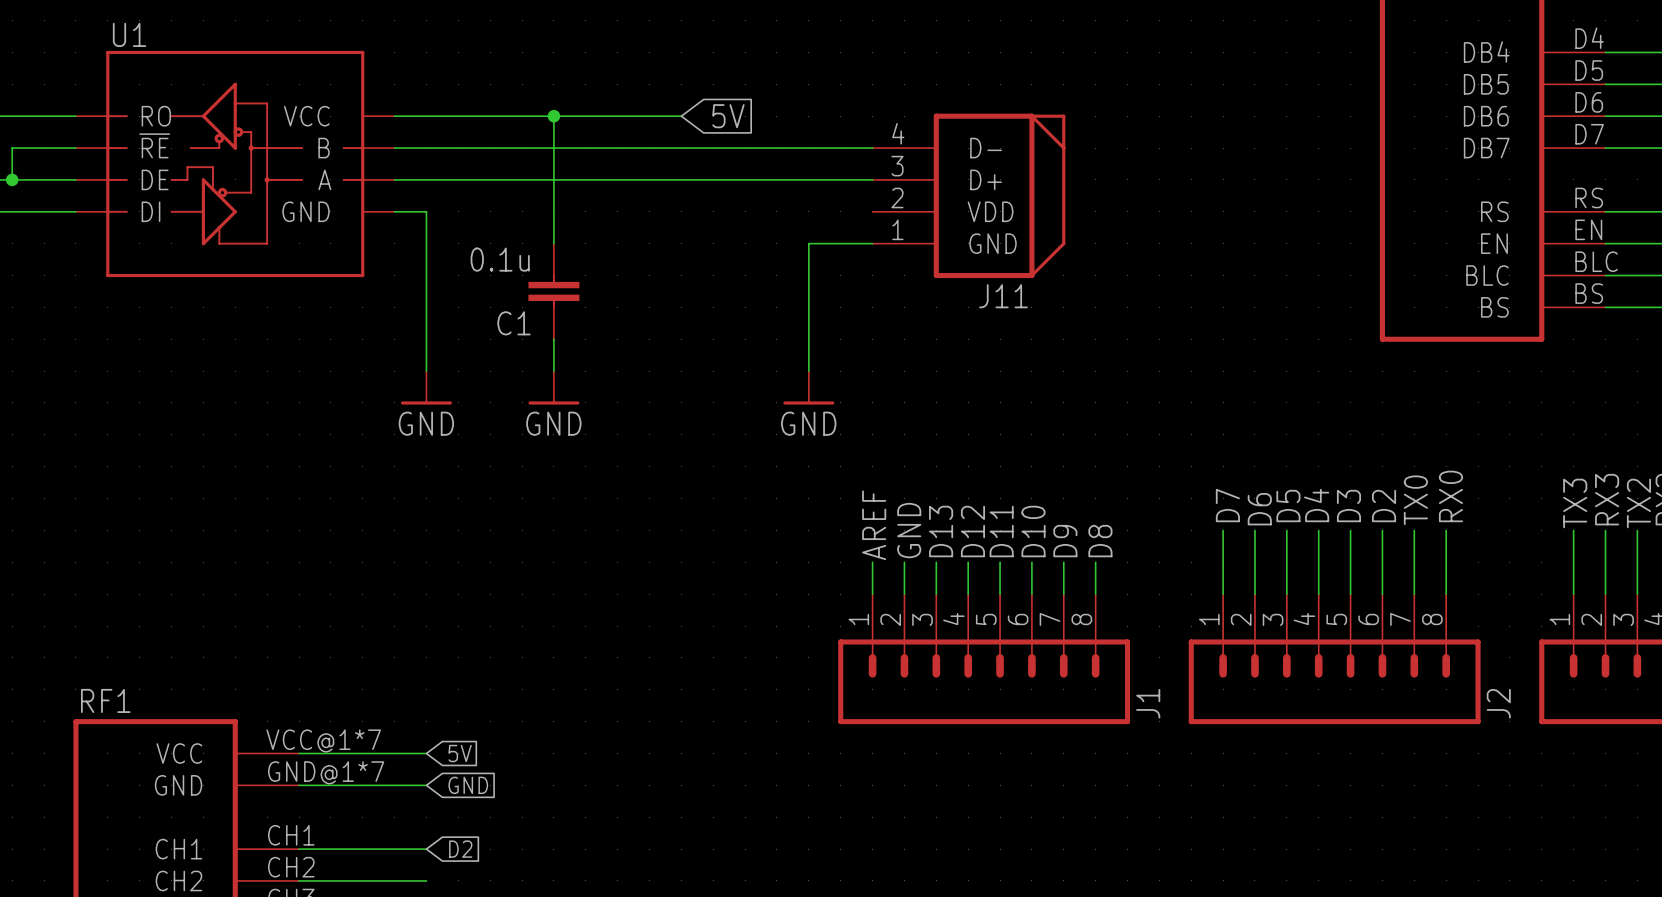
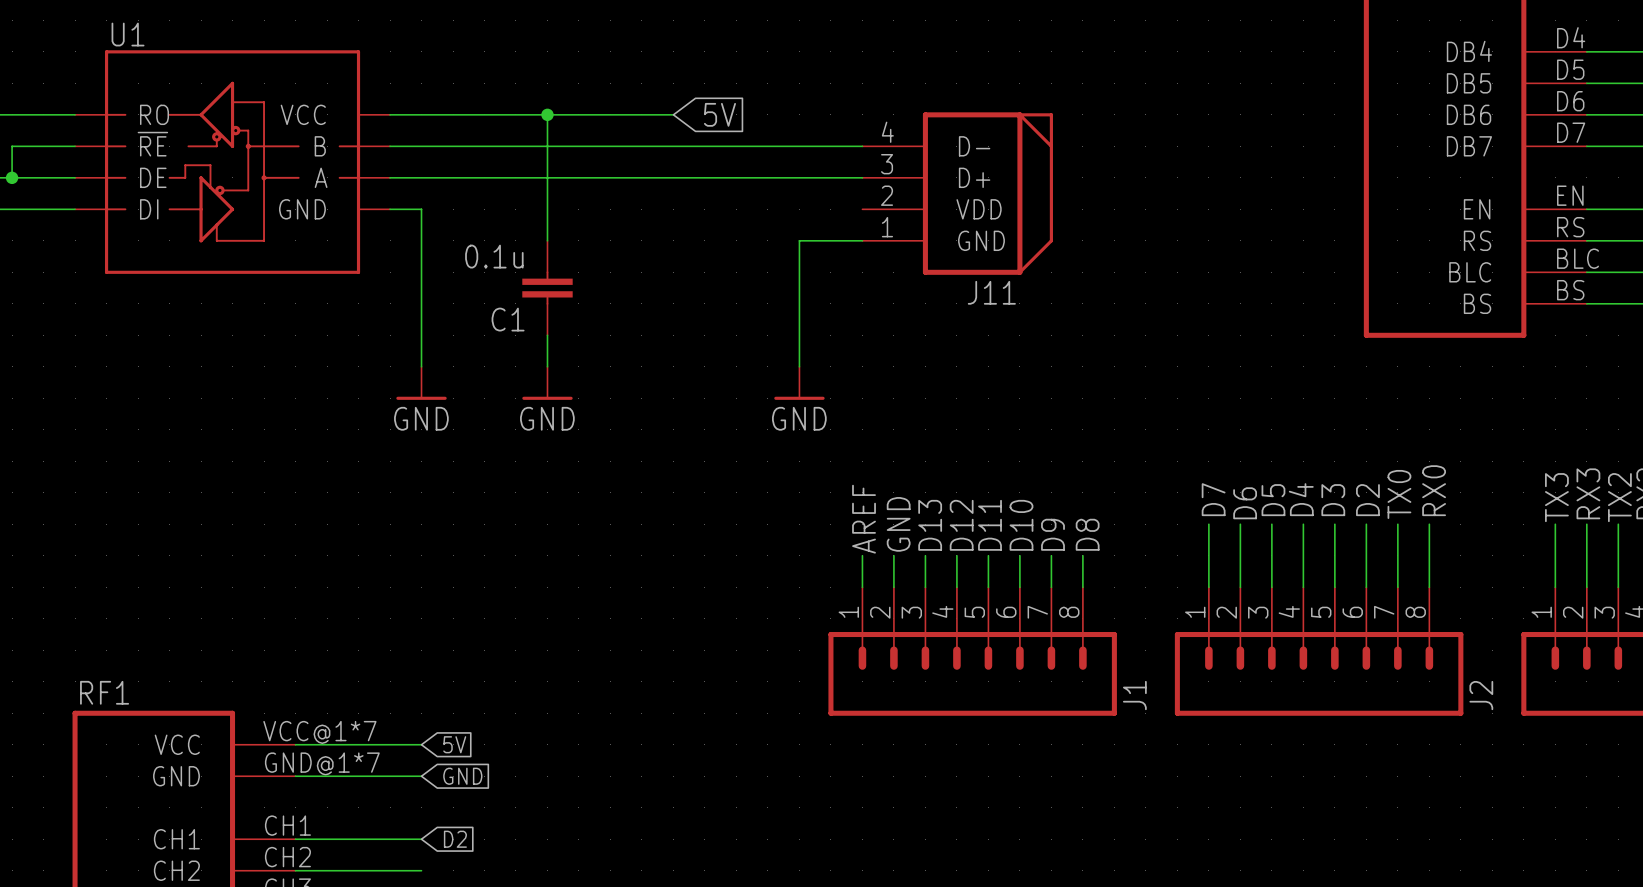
part pin number: RS (1589, 197) -> EN (1570, 195)
part pin name: RS (1494, 211) -> EN (1477, 209)
part pin number: EN (1588, 229) -> RS (1570, 227)
part pin name: EN (1494, 243) -> RS (1477, 240)

